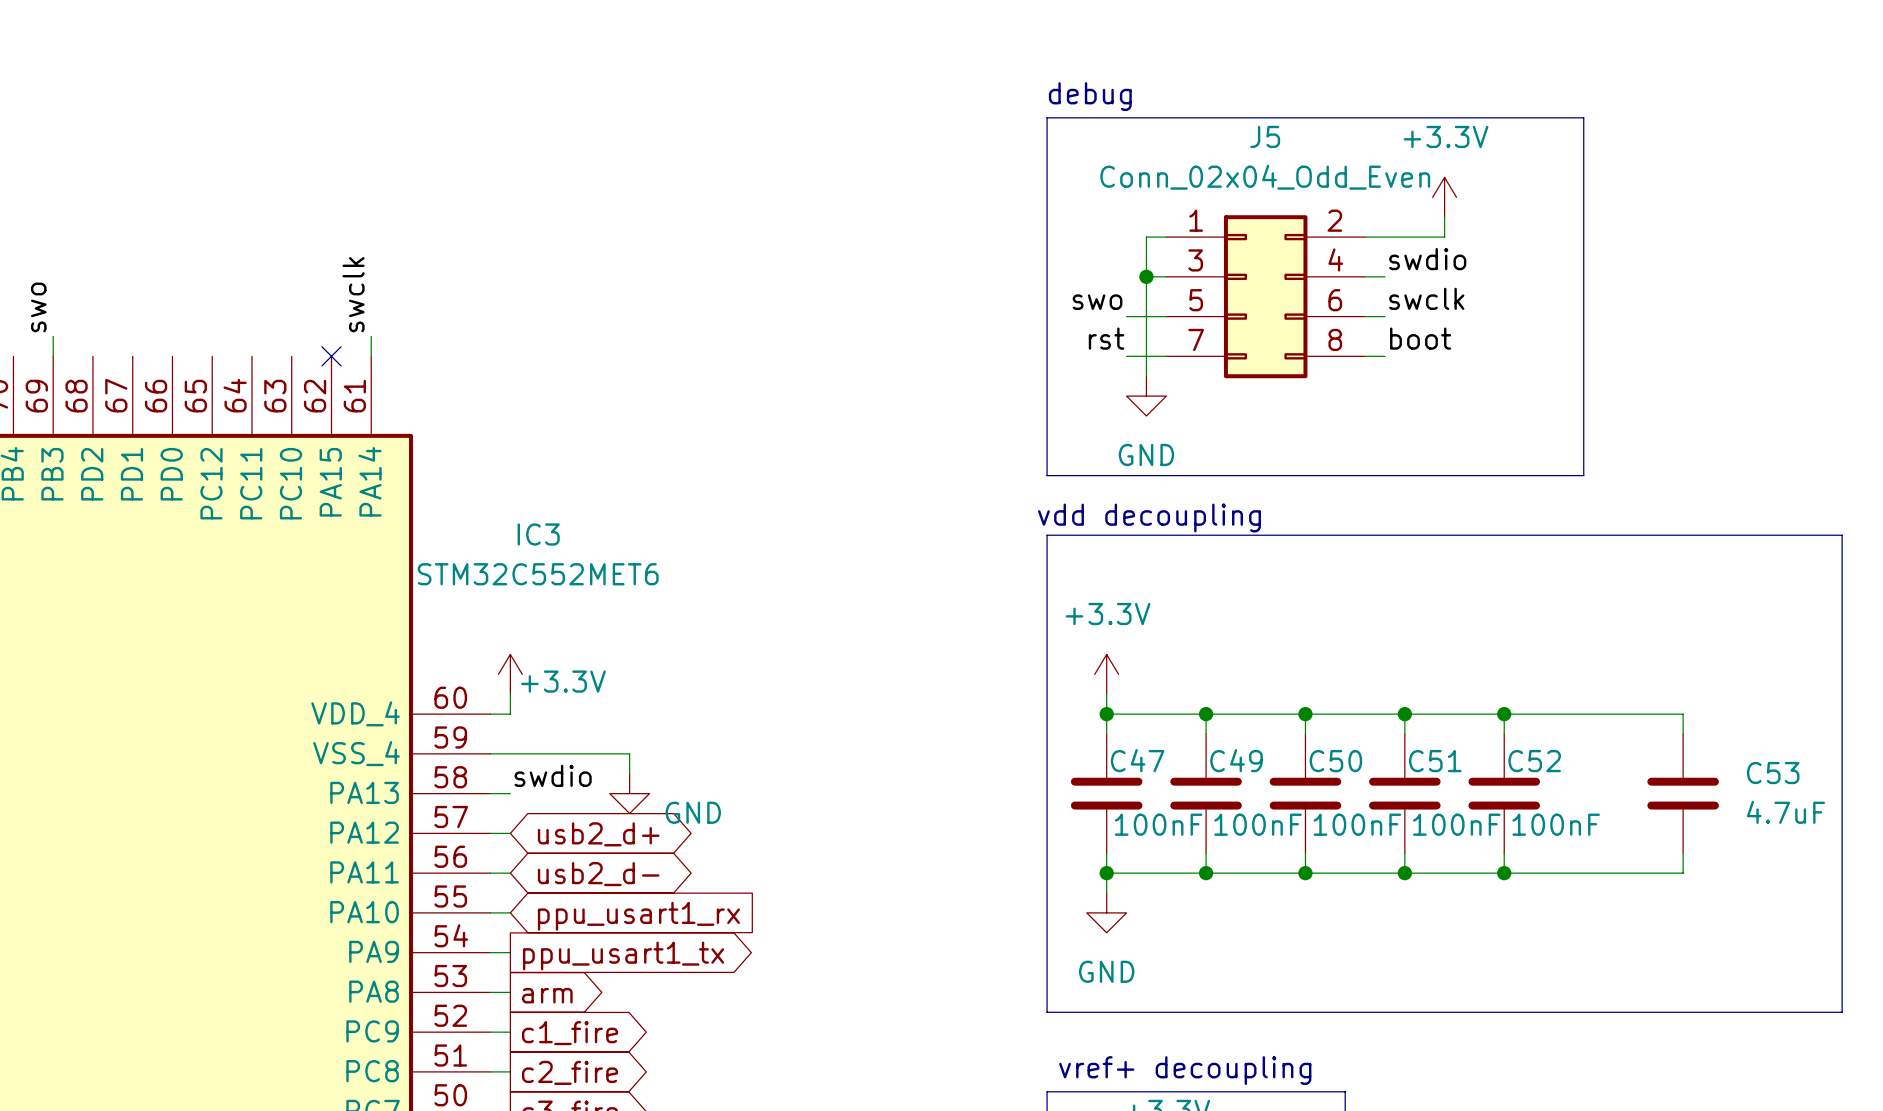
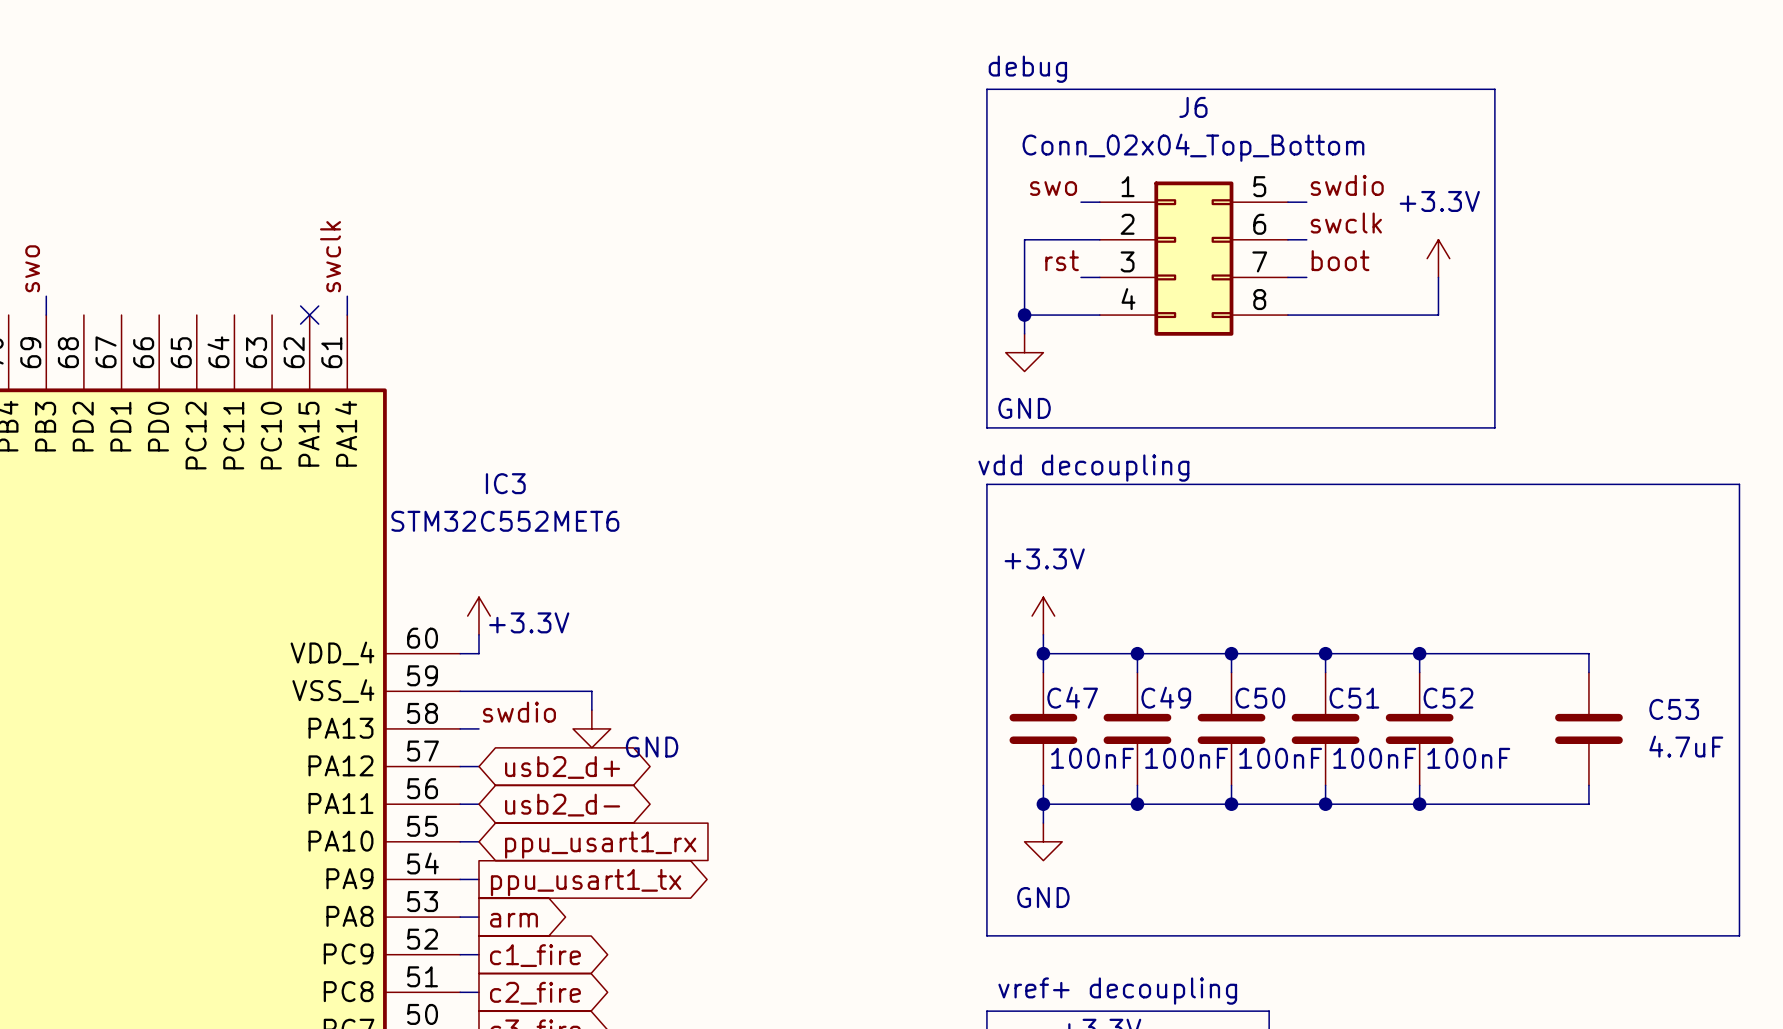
J5 name: J5 (1265, 136) -> J6 (1193, 107)
J5 value: Conn_02x04_Odd_Even (1265, 177) -> Conn_02x04_Top_Bottom (1193, 147)
power symbol position: +3.3V (1444, 197) -> +3.3V (1438, 258)
wire: (1444, 217) (1444, 237) (1384, 237) -> none
label: none -> swdio (1347, 185)
J5 pin number: 2 (1334, 220) -> 5 (1259, 186)
wire: (1146, 237) (1146, 376) -> none
J5 pin number: 4 (1335, 259) -> 6 (1259, 224)
label: swdio (1427, 259) -> swclk (1346, 223)
J5 pin number: 3 (1195, 260) -> 2 (1127, 224)
wire: none -> (1081, 239) (1024, 239) (1024, 333)
junction: (1146, 276) -> none
label: swclk (1426, 298) -> boot (1340, 260)
J5 pin number: 5 (1196, 300) -> 3 (1127, 261)
J5 pin number: 6 (1335, 300) -> 7 (1259, 261)
label position: swo (1097, 302) -> swo (1053, 188)
wire: (1126, 316) (1146, 316) -> none
wire: none -> (1438, 277) (1438, 315) (1306, 315)
label position: rst (1106, 338) -> rst (1062, 260)
label: boot (1420, 338) -> none
J5 pin number: 7 (1196, 339) -> 4 (1128, 299)
wire: none -> (1024, 315) (1062, 315)
junction: none -> (1024, 315)
power symbol position: GND (1146, 396) -> GND (1024, 352)

